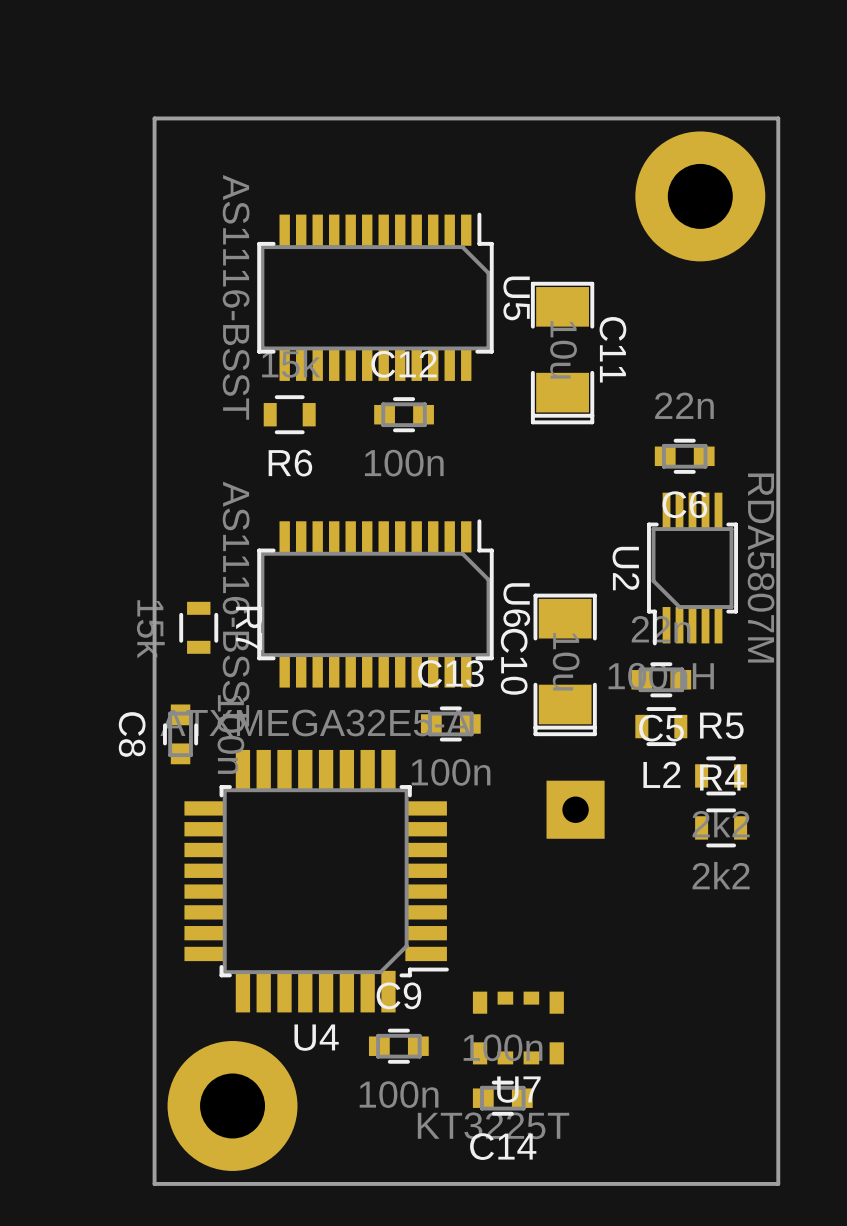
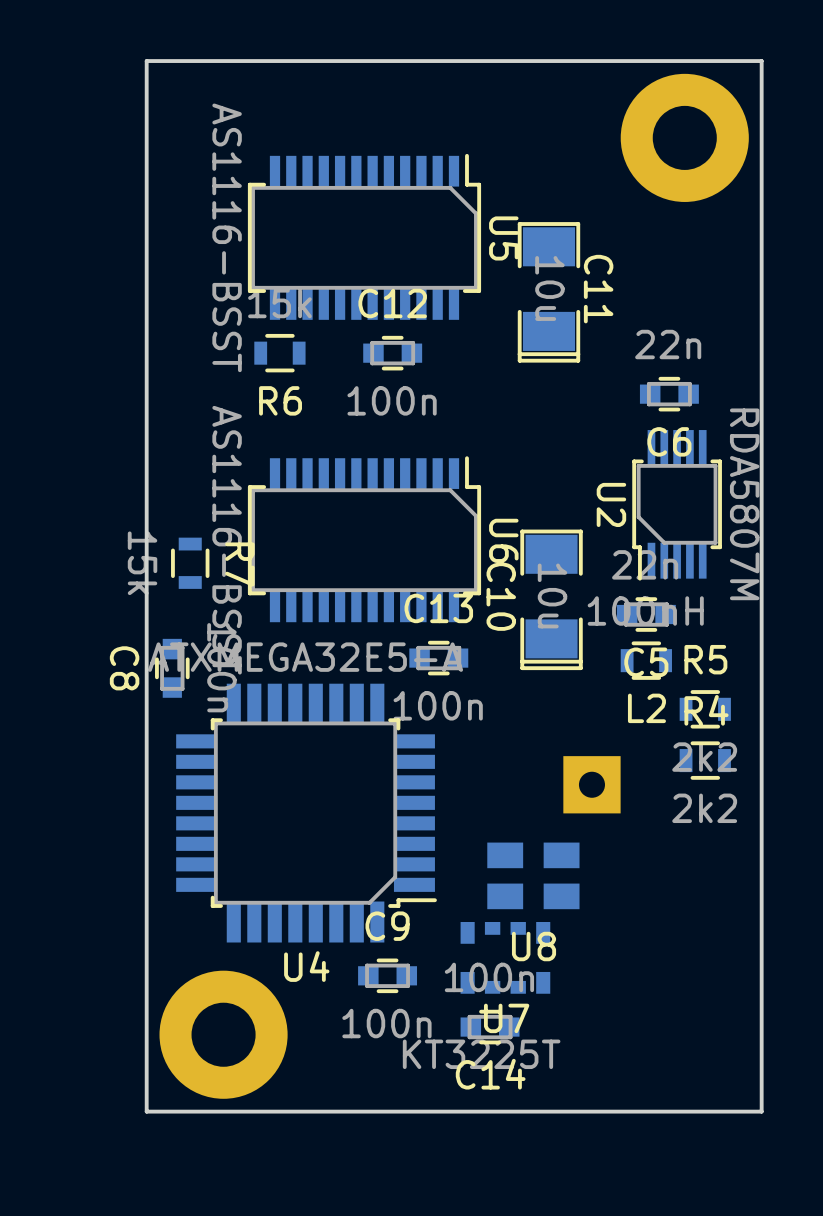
part position: (575, 809) -> (591, 784)
U8: none -> (533, 875)

